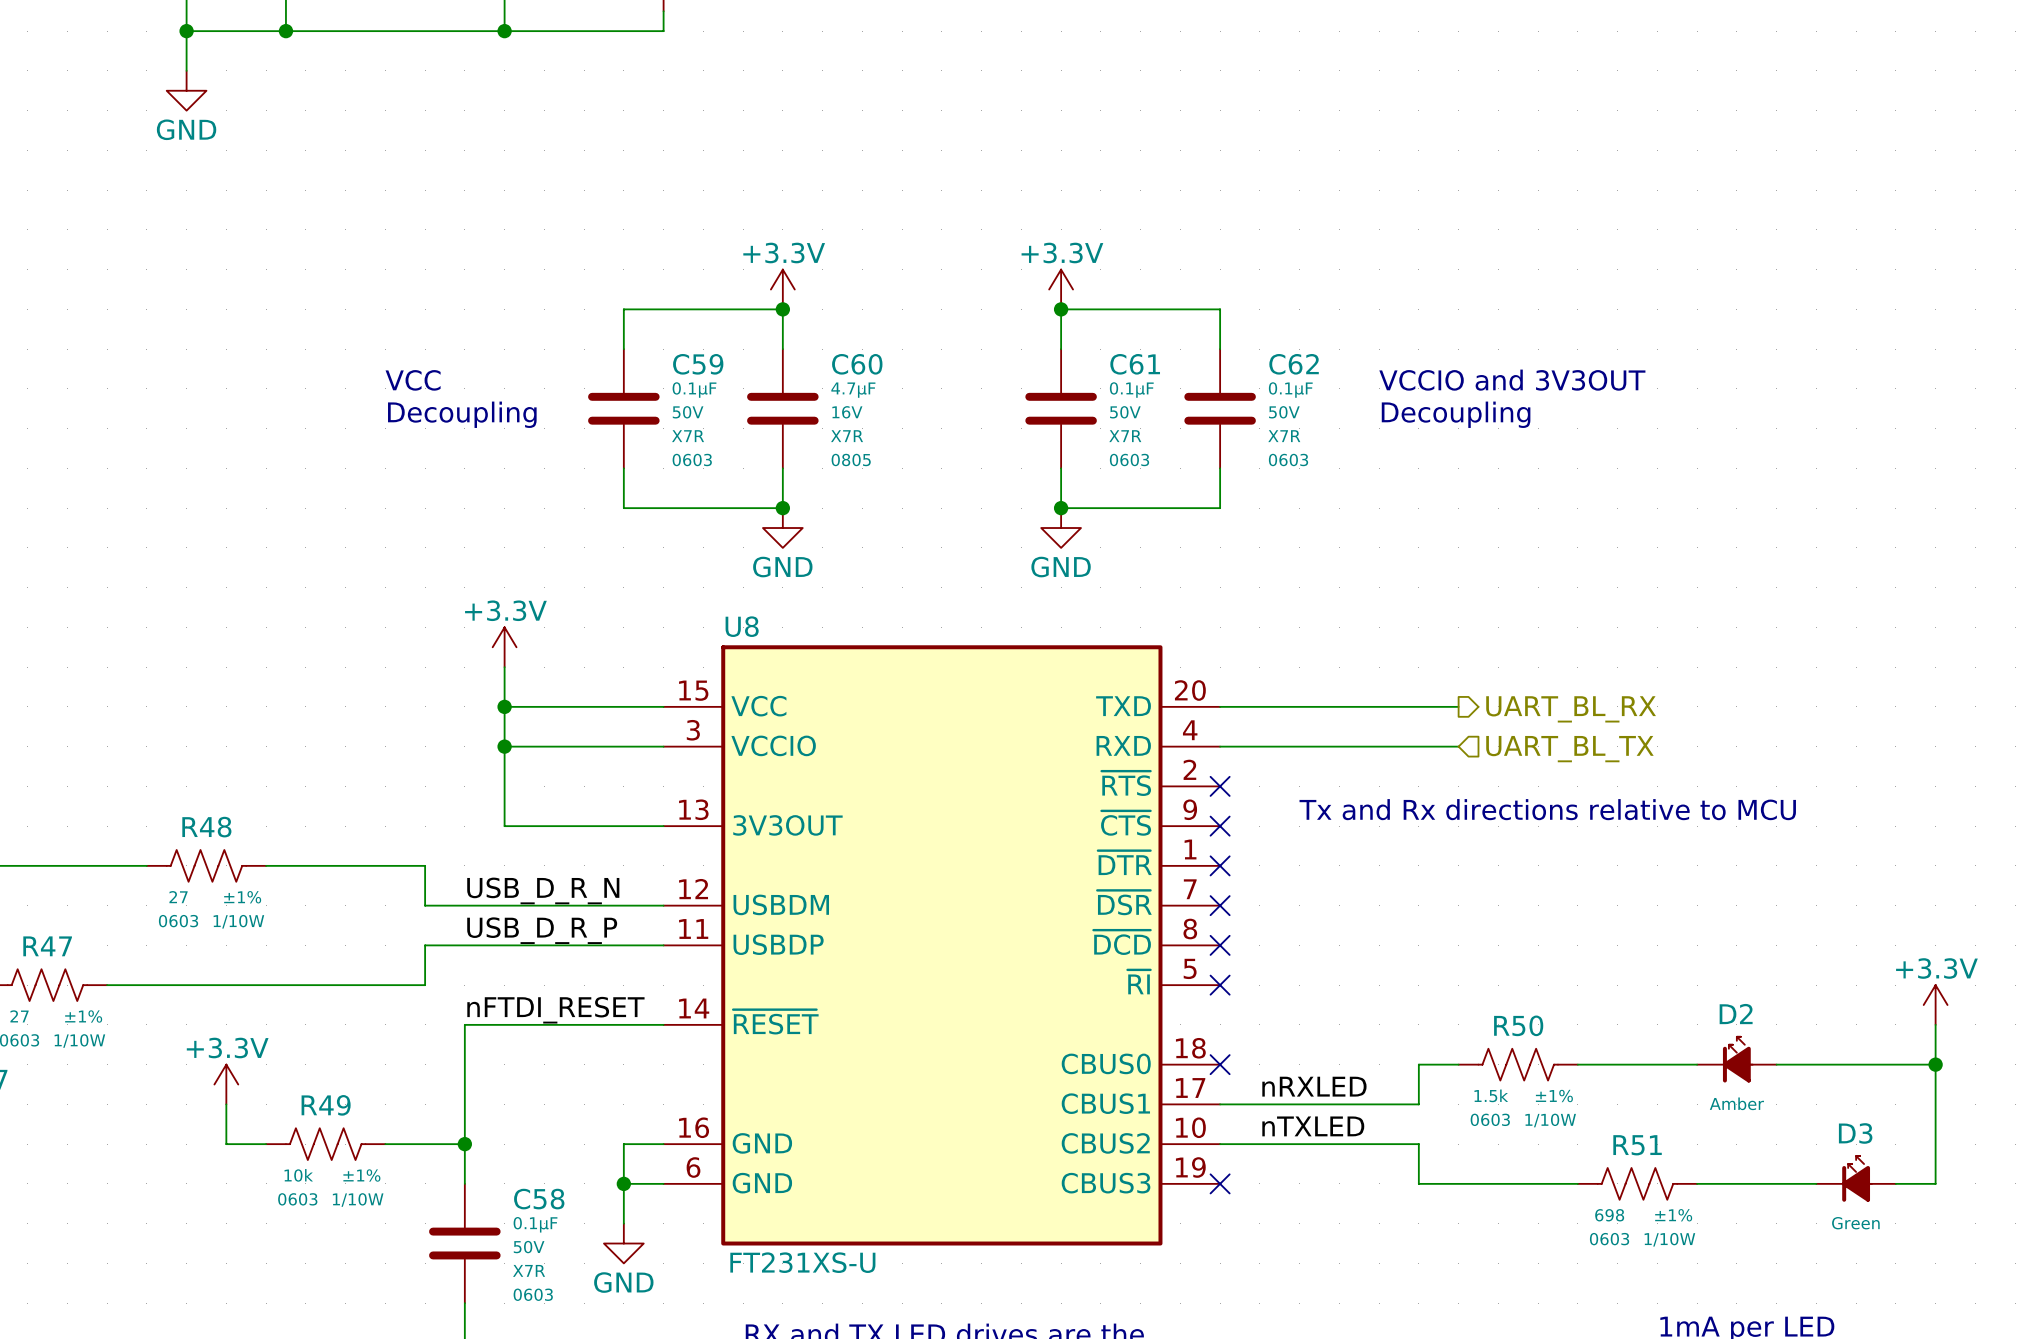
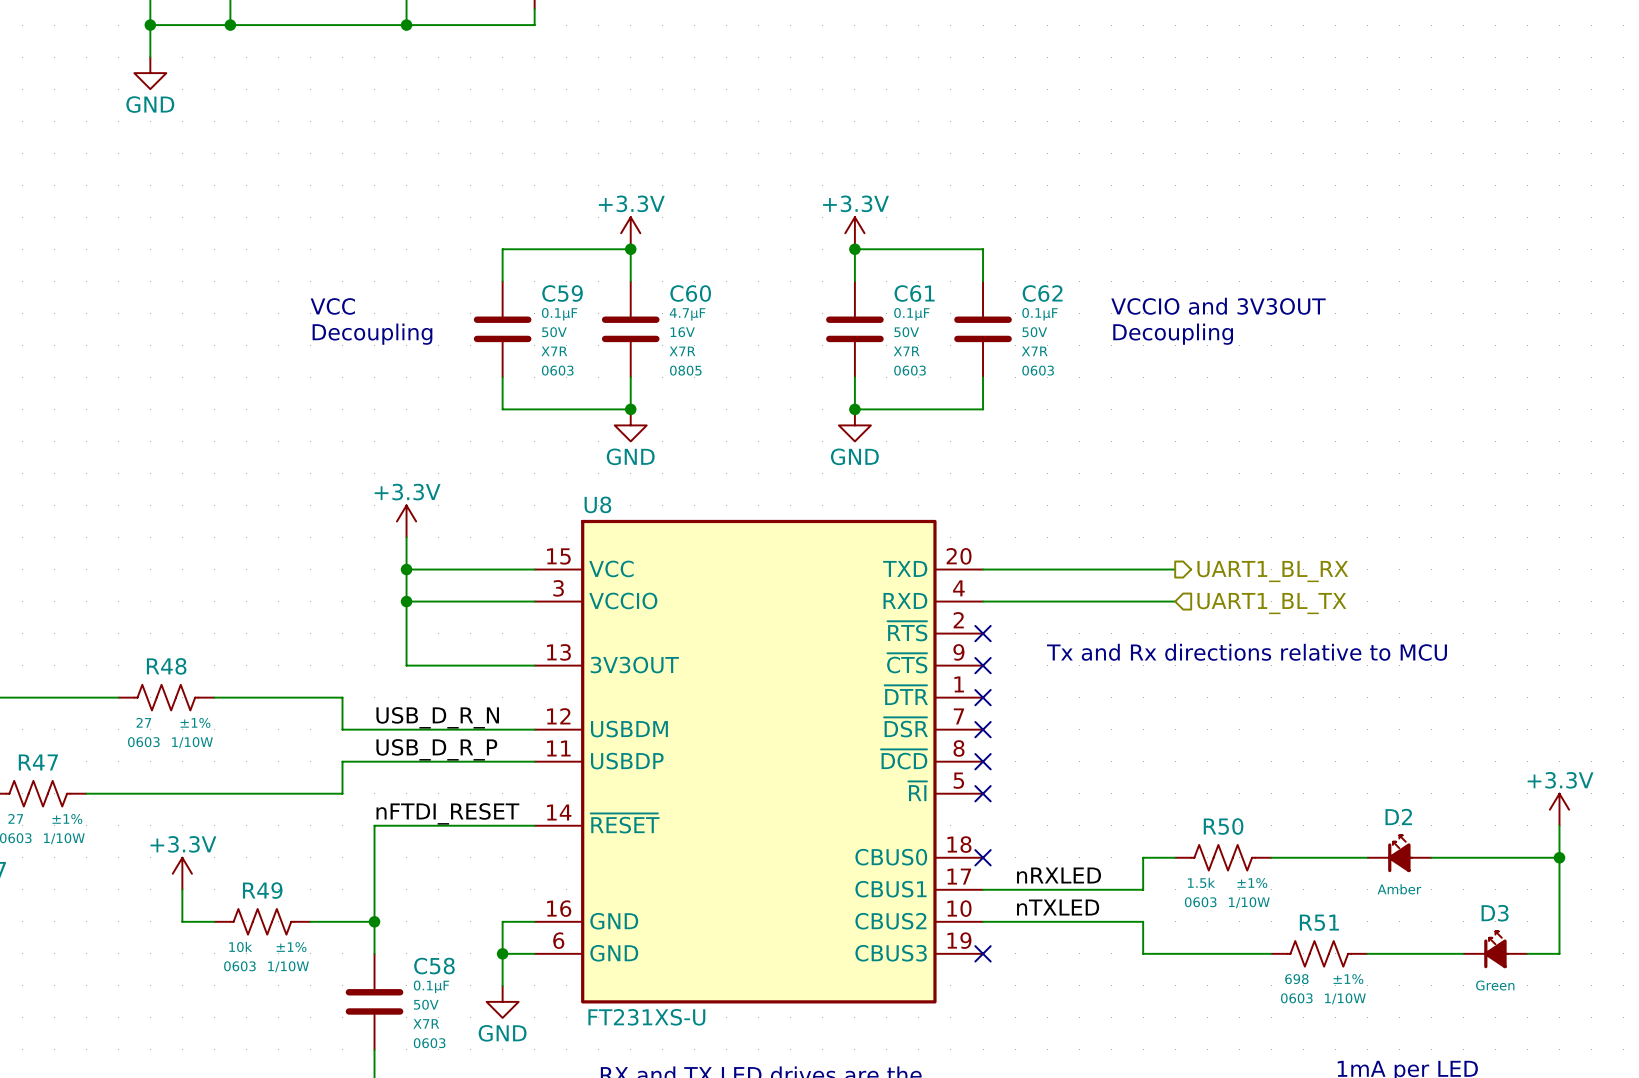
hierarchical label: UART_BL_RX (1571, 709) -> UART1_BL_RX (1272, 571)
hierarchical label: UART_BL_TX (1569, 749) -> UART1_BL_TX (1271, 603)

